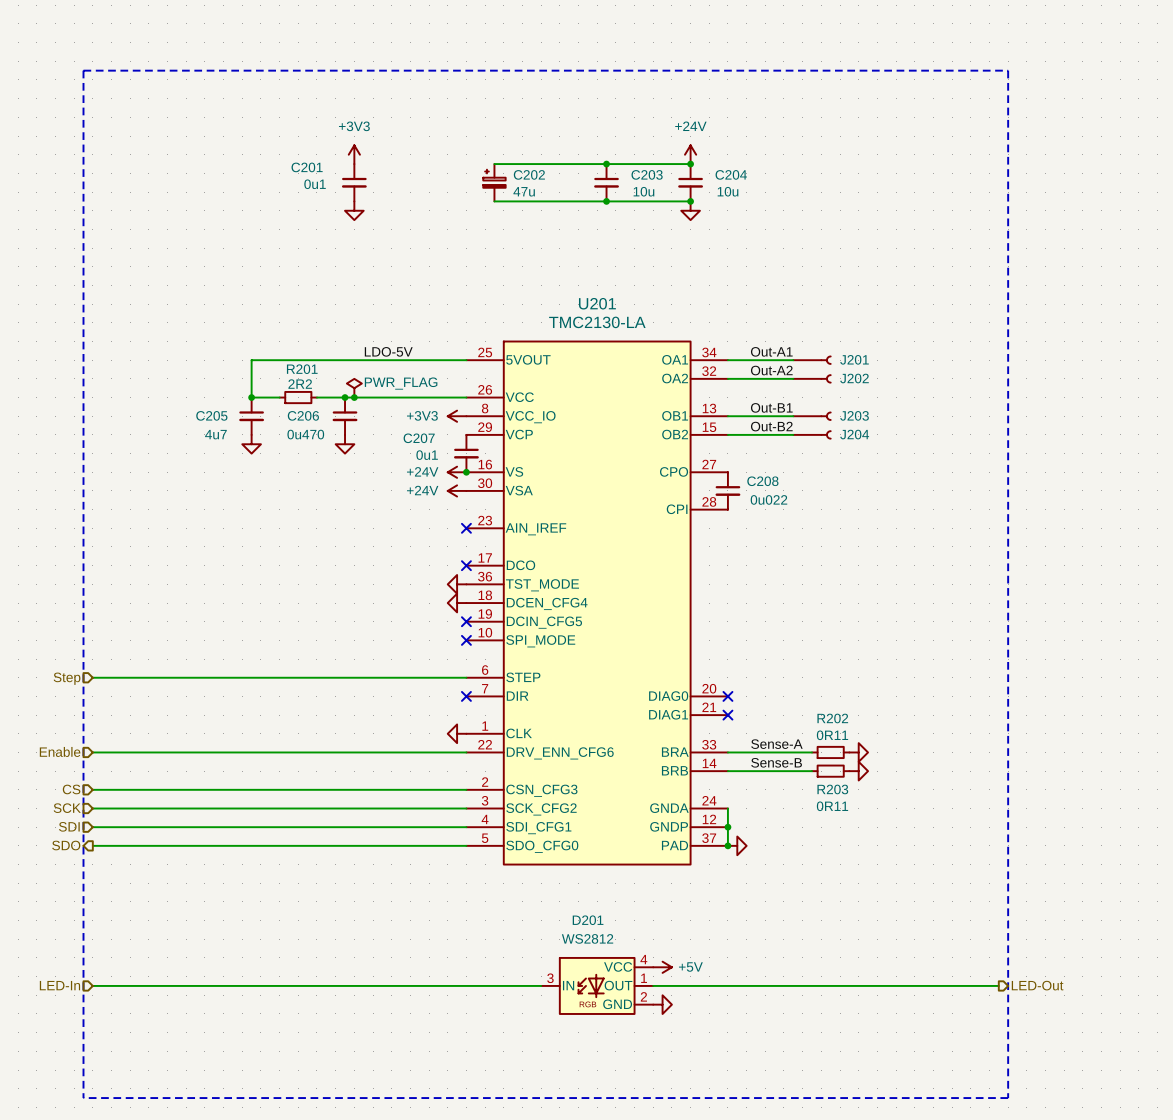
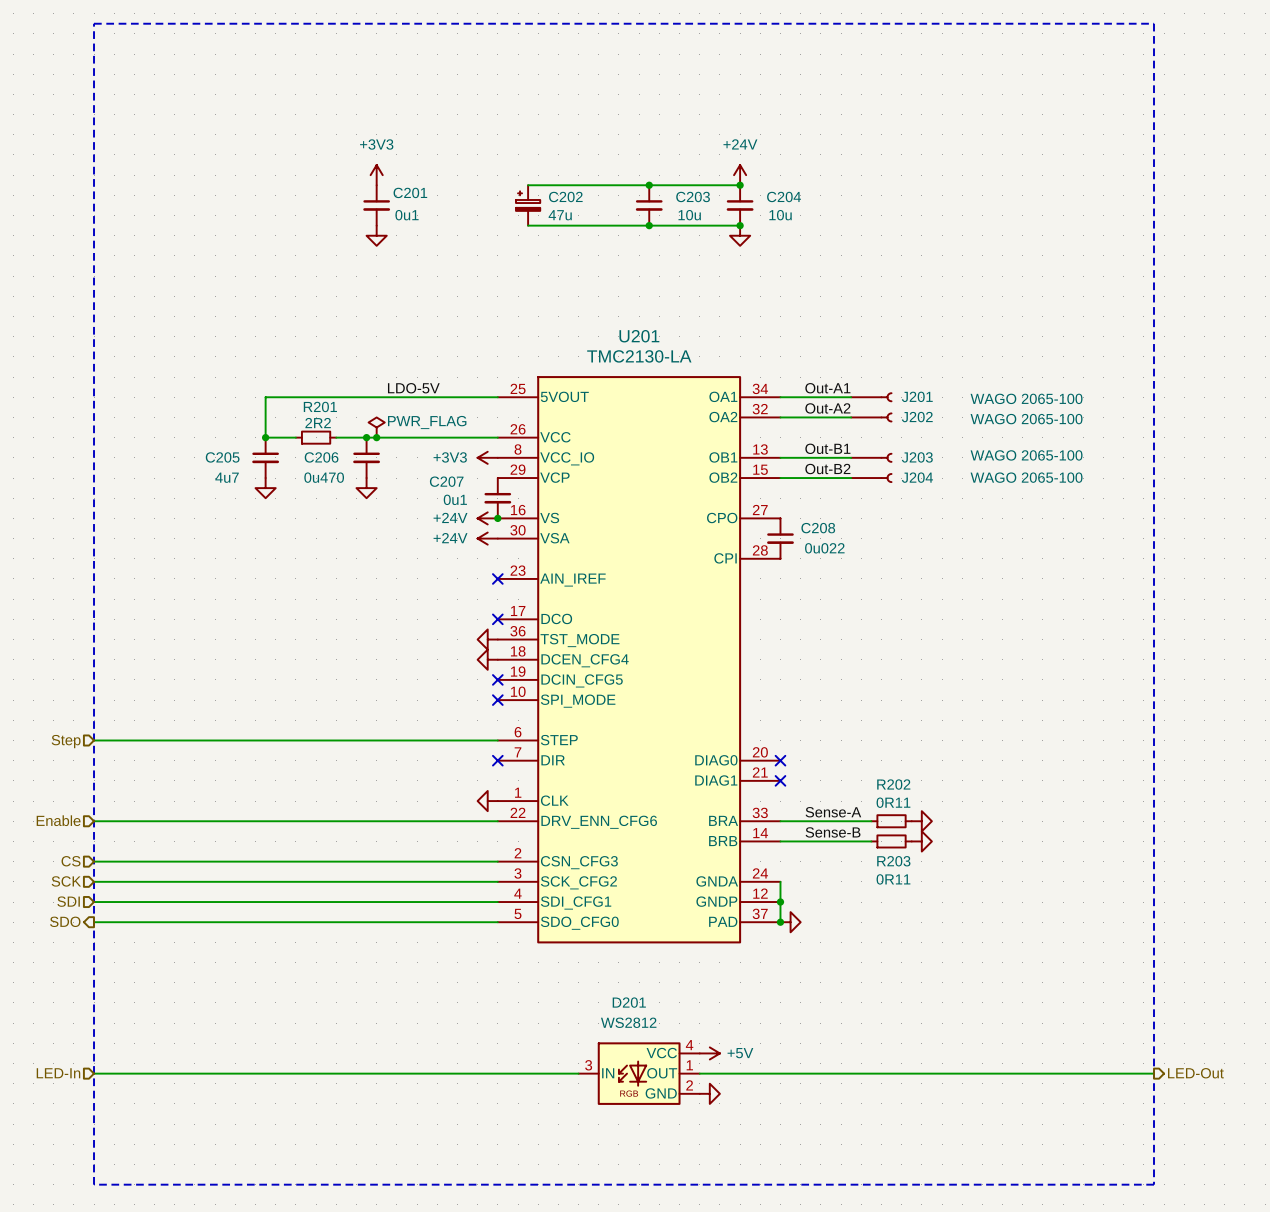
line: (83, 70) (1008, 70) (1008, 1098) (83, 1098) (83, 70) -> (94, 23) (94, 1184) (1154, 1184) (1154, 23) (94, 23)
C201 name position: C201 (307, 167) -> C201 (410, 192)
C201 value position: 0u1 (315, 184) -> 0u1 (407, 215)
J201 value: none -> WAGO 2065-100 (1026, 398)
J202 value: none -> WAGO 2065-100 (1026, 419)
J203 value: none -> WAGO 2065-100 (1026, 455)
J204 value: none -> WAGO 2065-100 (1026, 477)
wire: none -> (1073, 1073) (1154, 1073)
hierarchical label position: LED-Out (1037, 985) -> LED-Out (1195, 1073)

